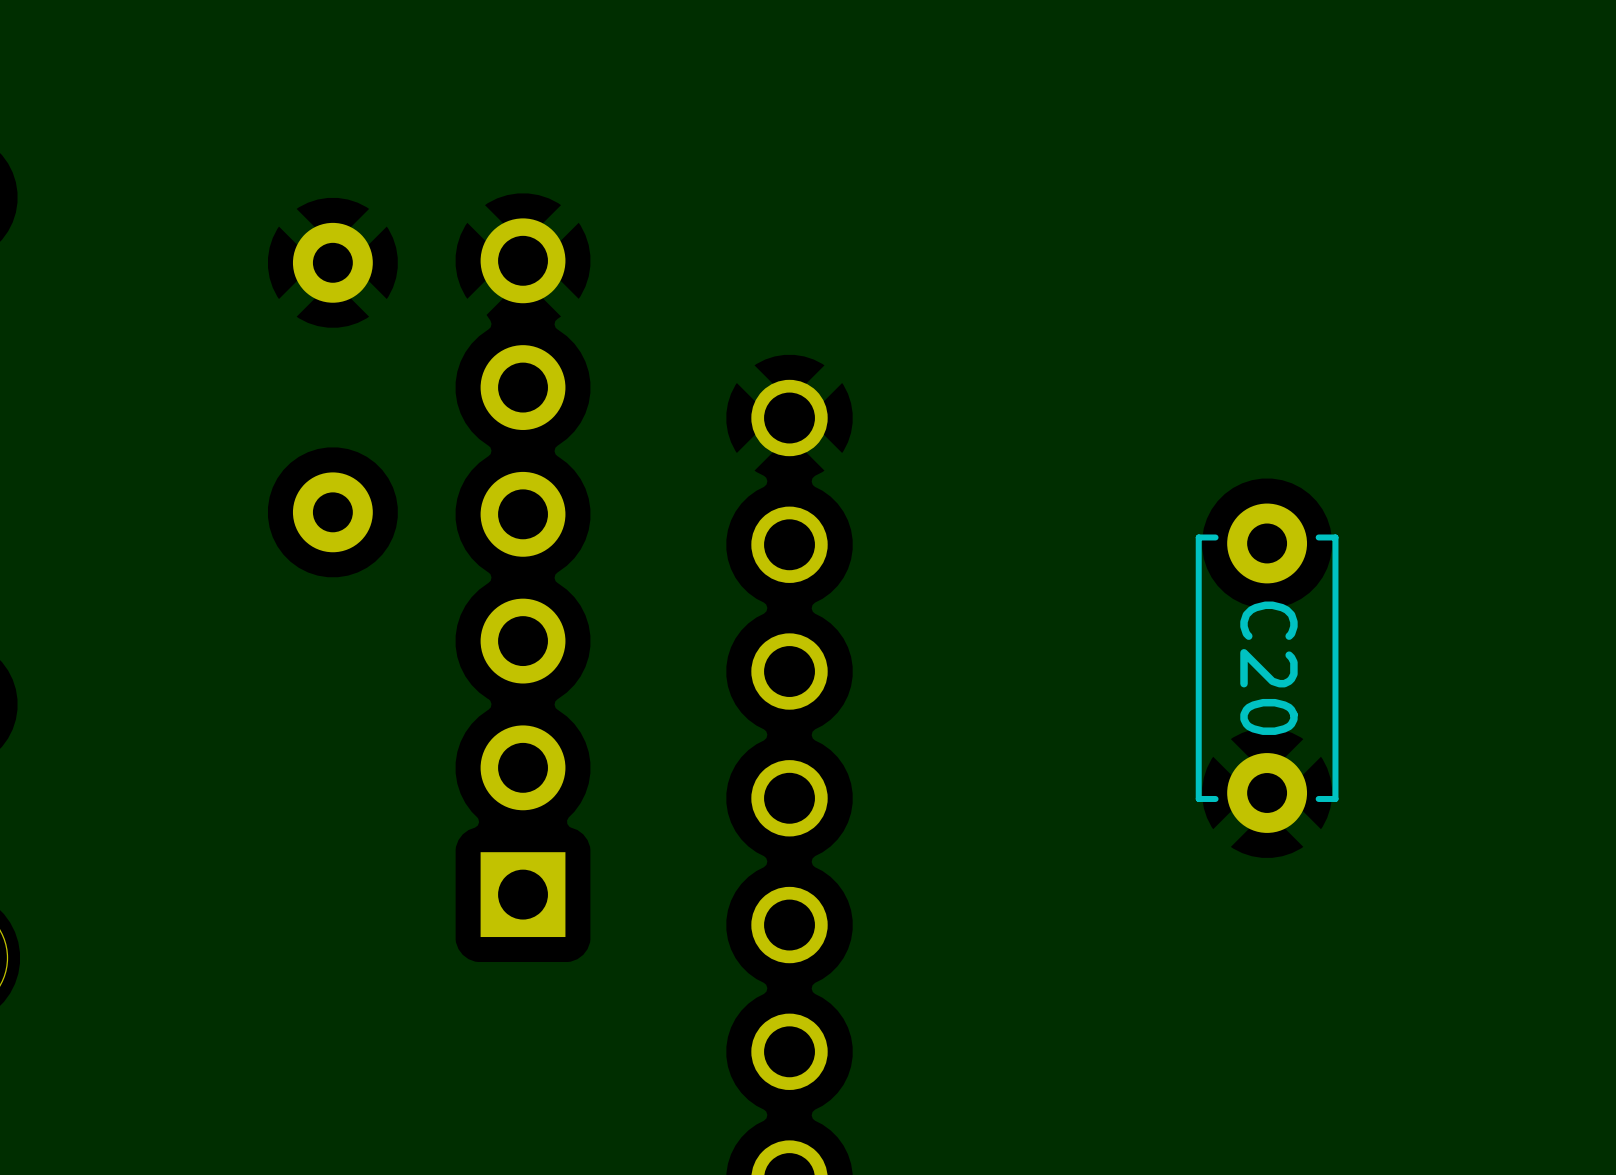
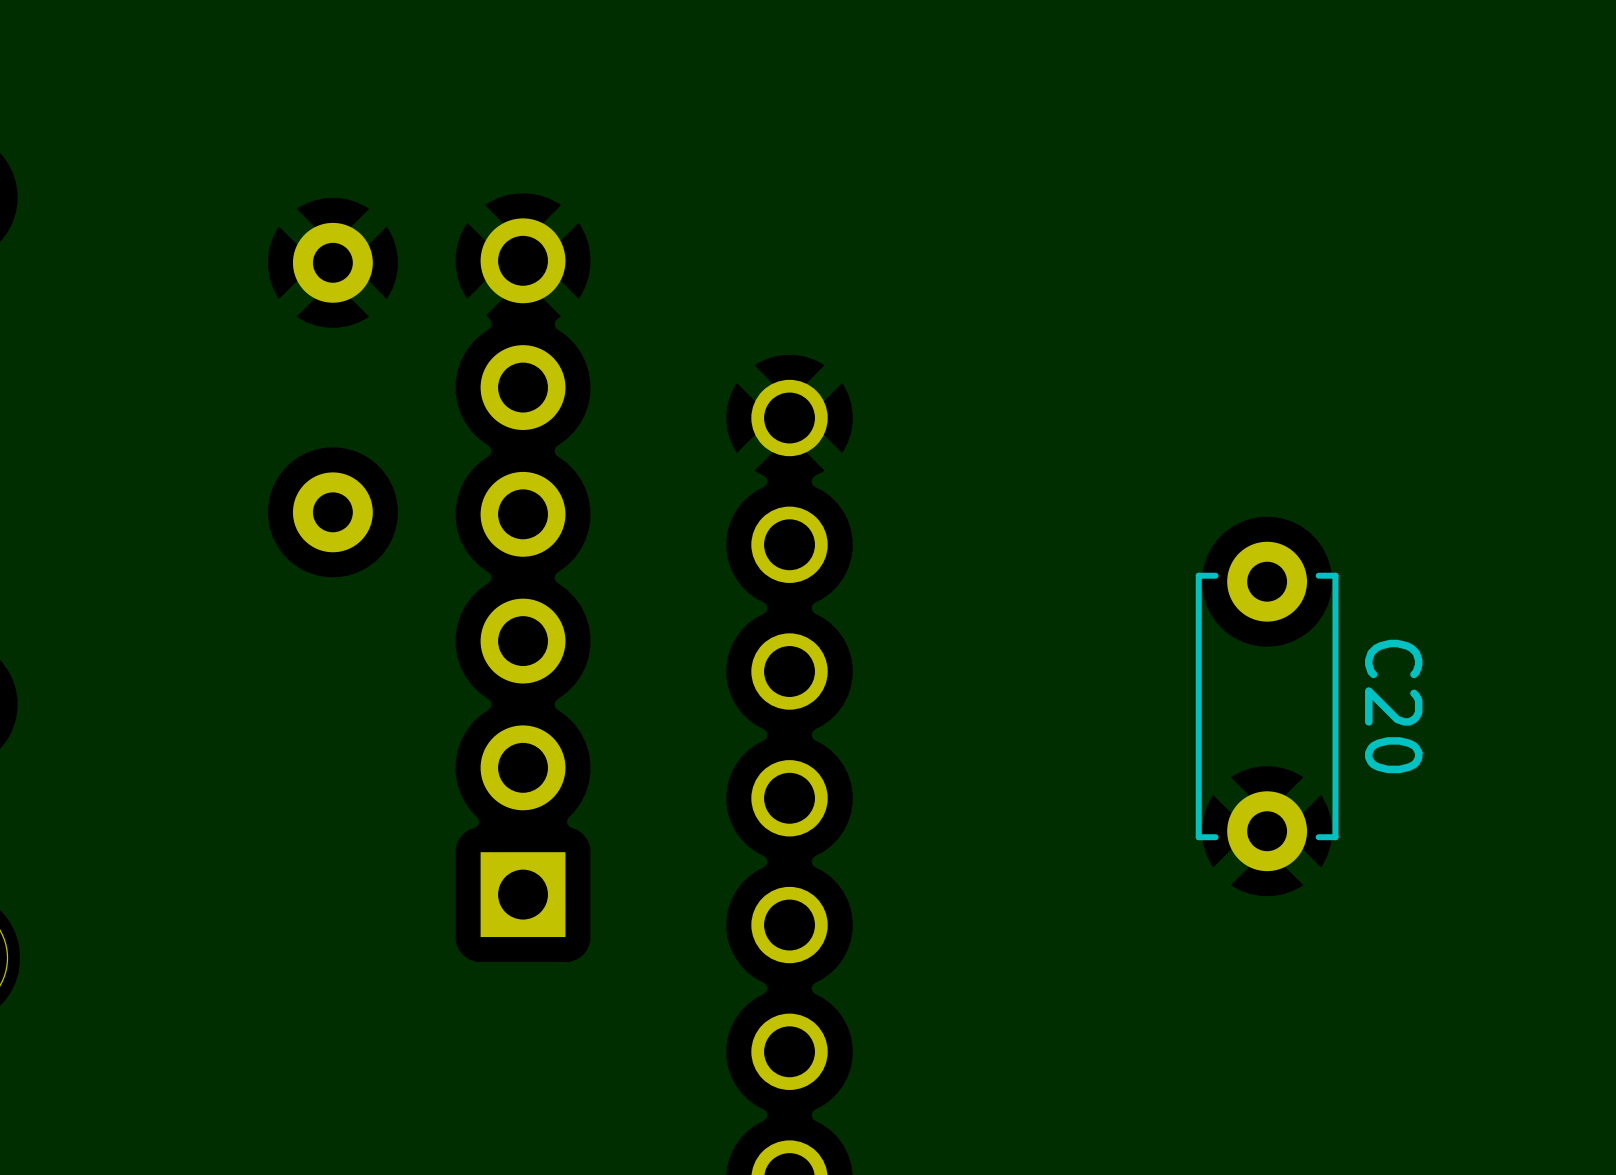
C20 position: (1267, 668) -> (1267, 706)
C20 name position: C20 (1268, 668) -> C20 (1393, 706)

